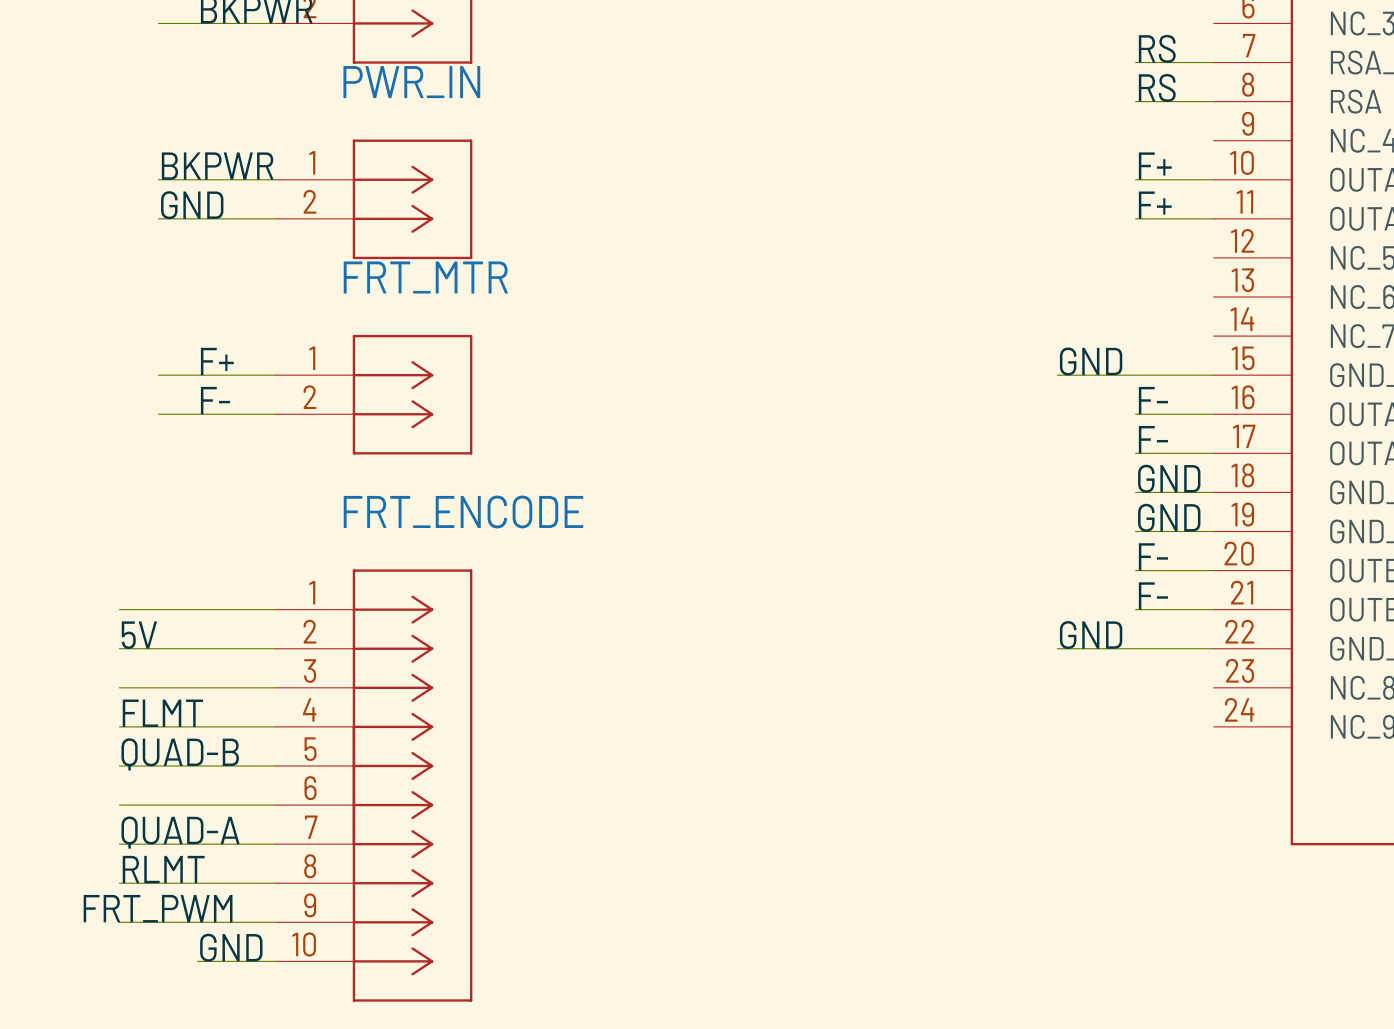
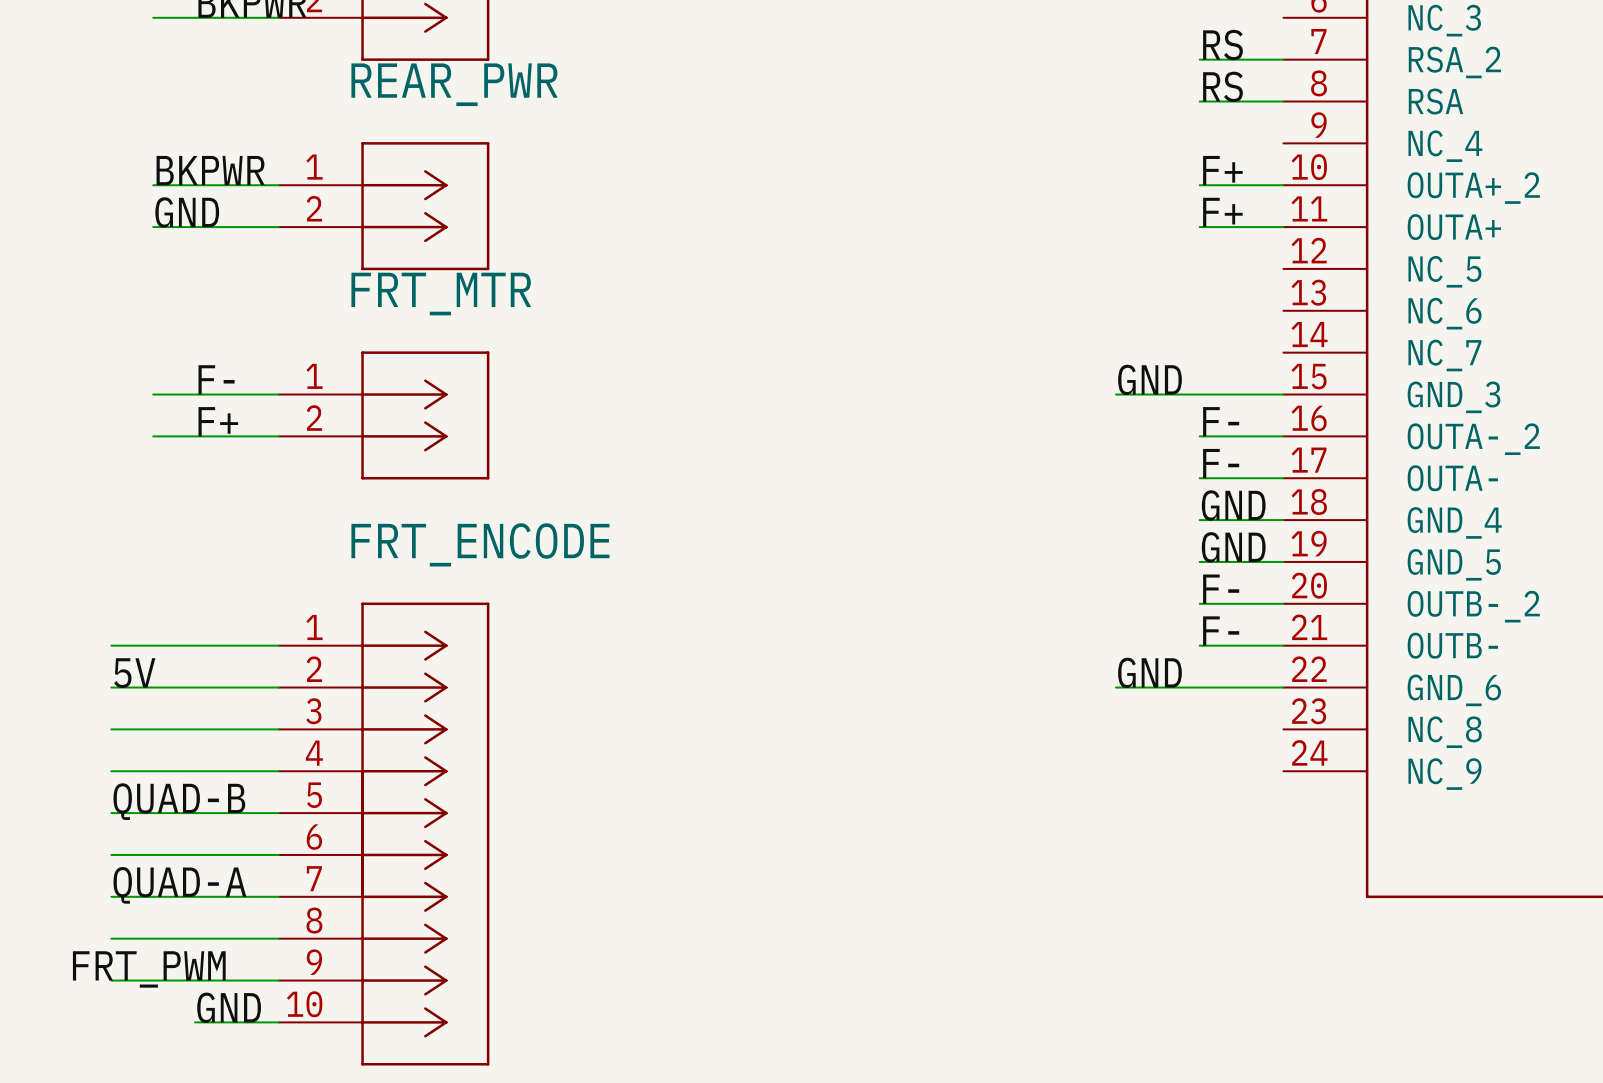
PWR_IN name: PWR_IN (411, 82) -> REAR_PWR (454, 84)
label: F+ (217, 361) -> F- (216, 379)
label: F- (215, 400) -> F+ (218, 421)
label: FLMT (162, 713) -> none
label: RLMT (163, 869) -> none

